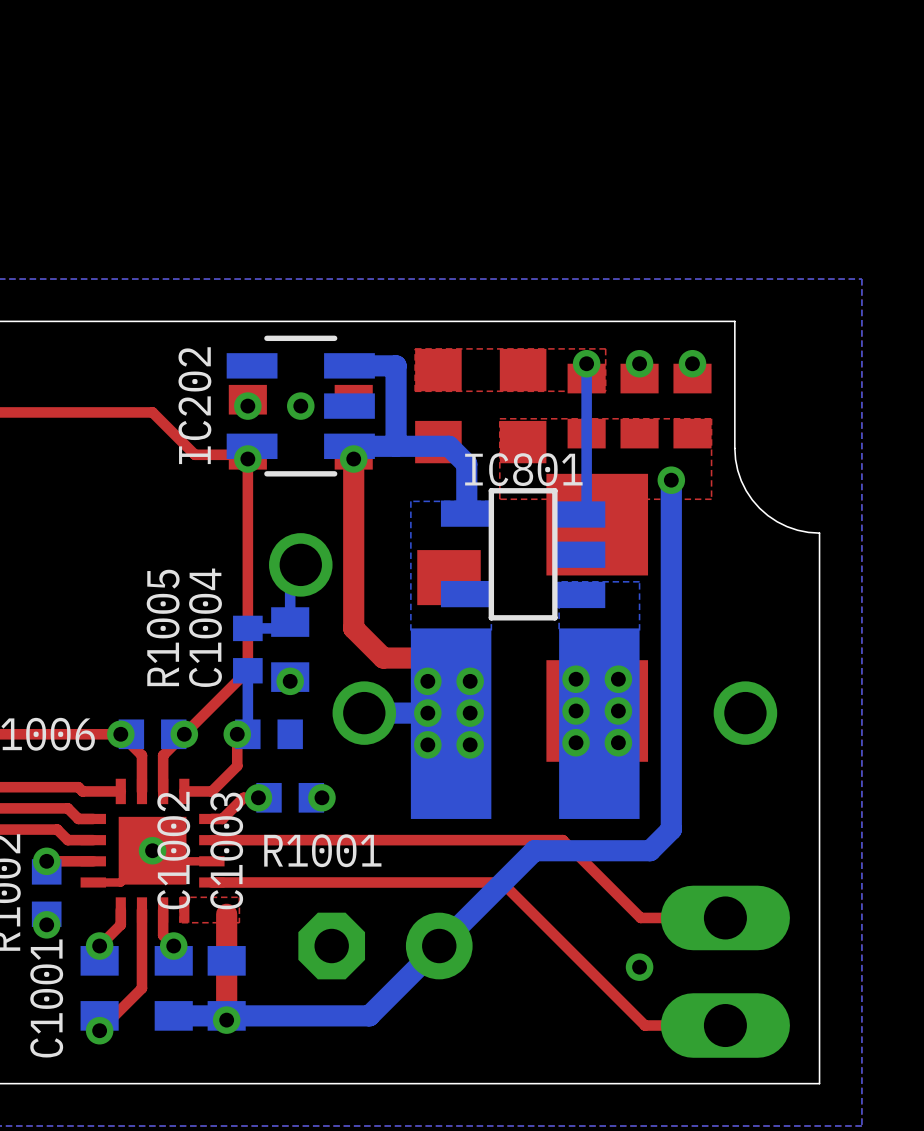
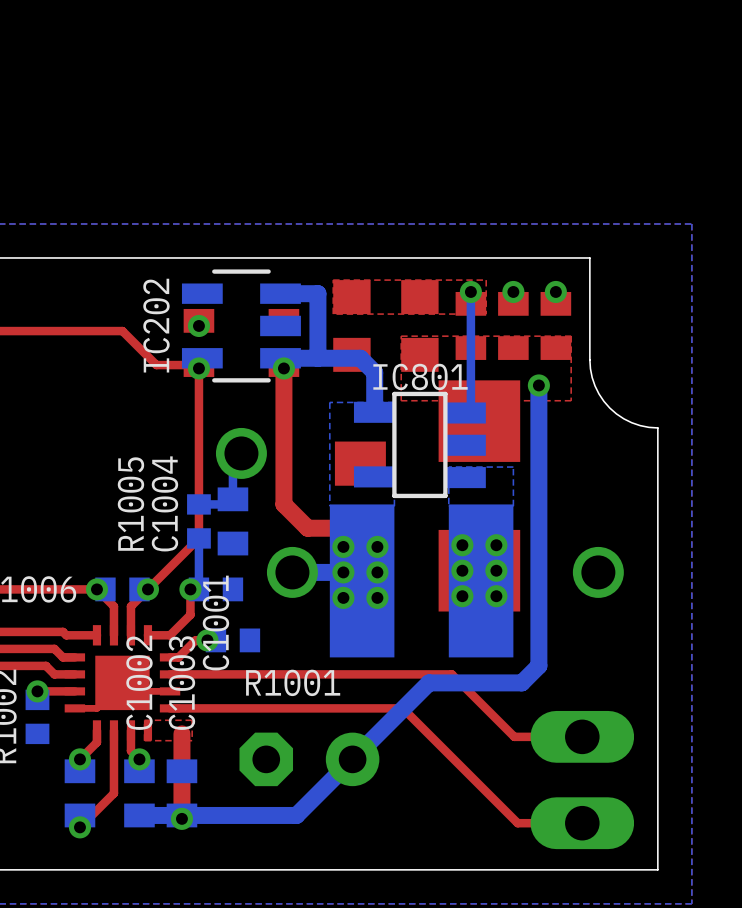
via: (300, 406) -> none
via: (290, 681) -> none
via: (321, 797) -> none
via: (152, 850) -> none
R1001 name position: R1001 (322, 850) -> R1001 (293, 682)
via: (46, 924) -> none
via: (639, 967) -> none
C1001 name position: C1001 (46, 998) -> C1001 (215, 623)

